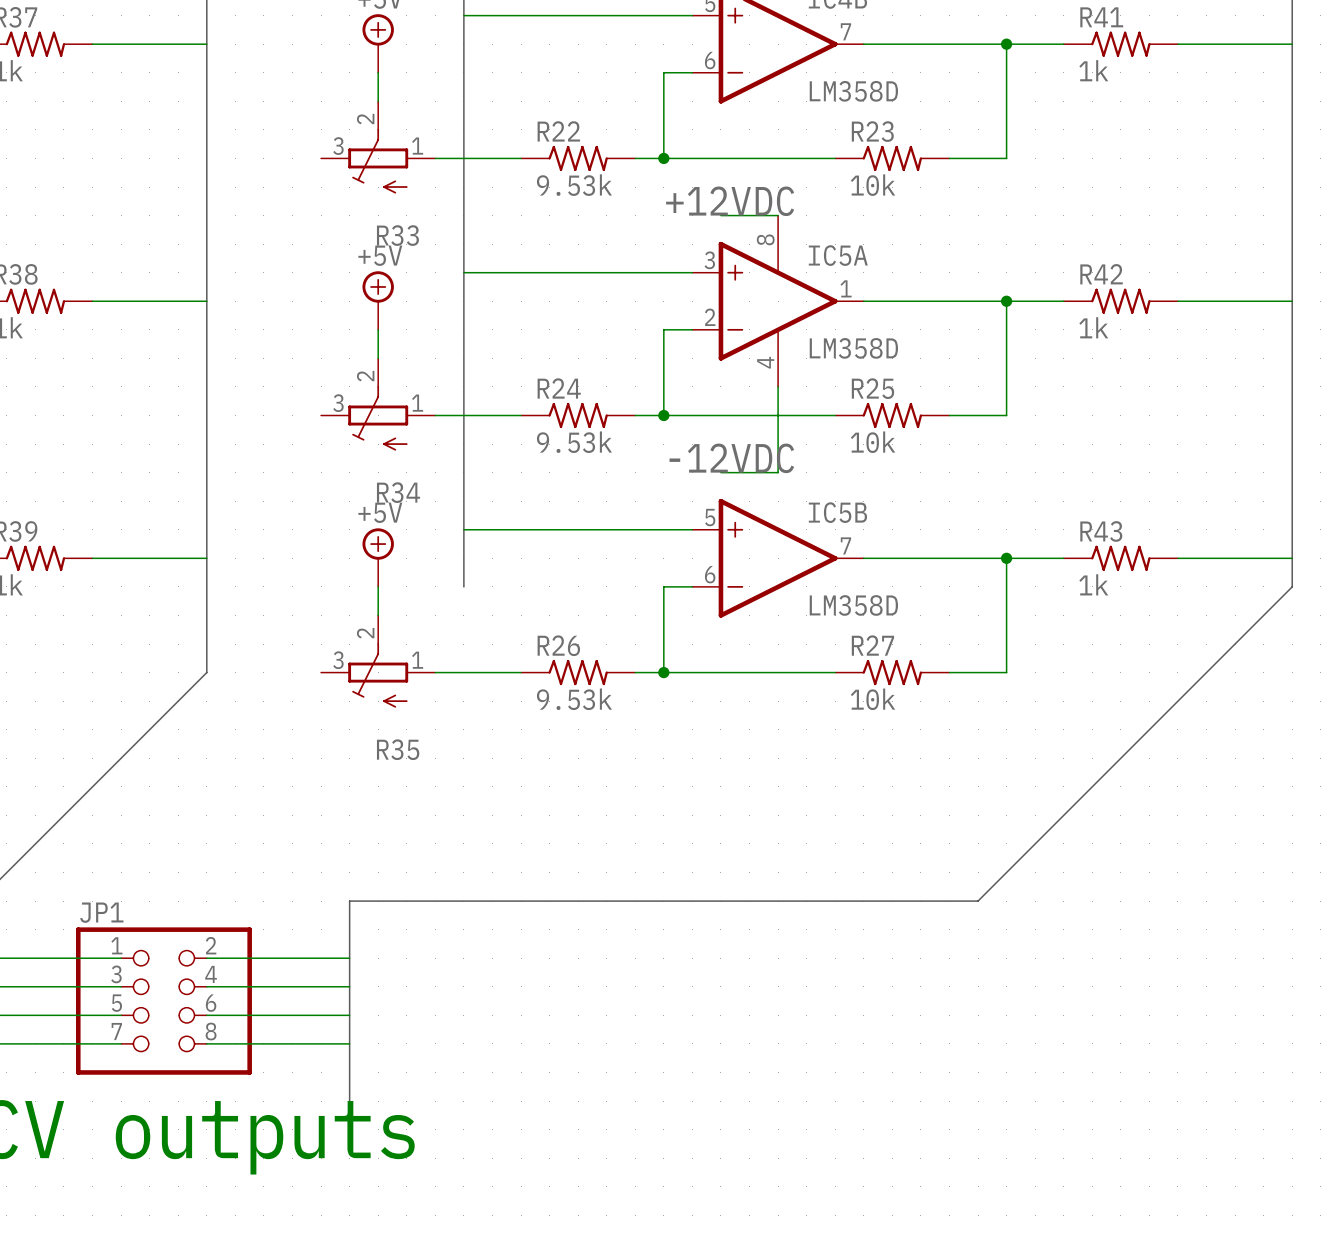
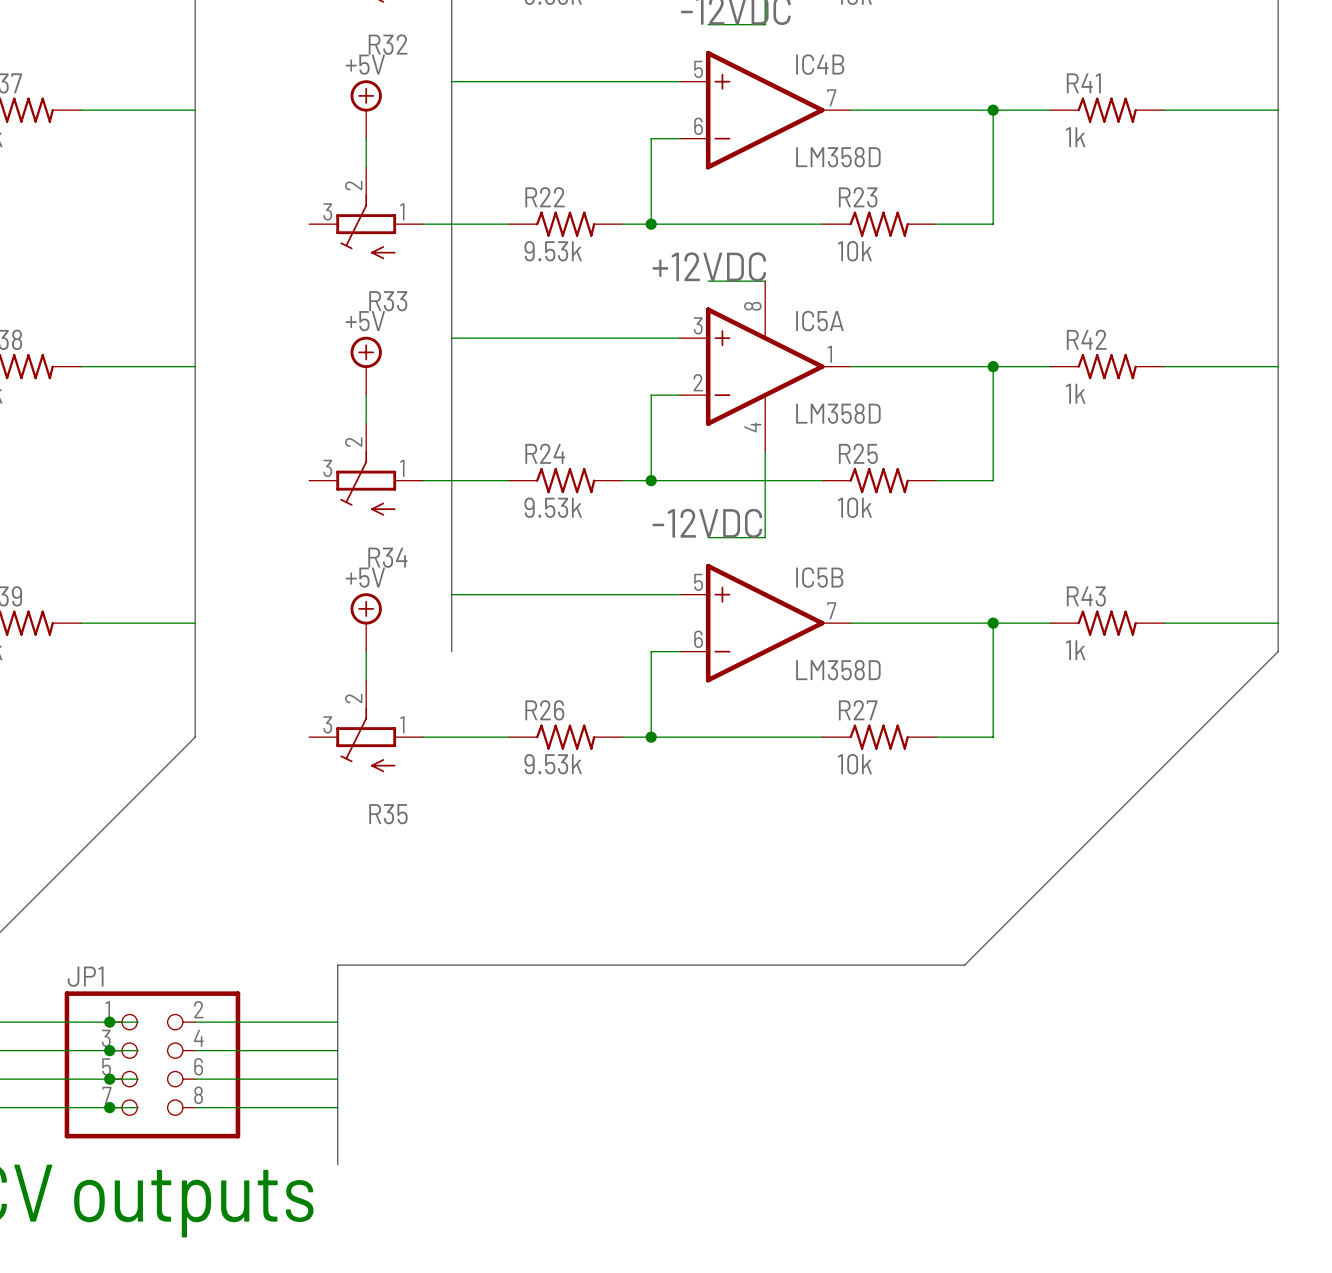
wire: none -> (109, 1022) (138, 1022)
junction: none -> (109, 1022)
wire: none -> (109, 1050) (138, 1050)
junction: none -> (109, 1050)
wire: none -> (109, 1079) (138, 1079)
junction: none -> (109, 1079)
wire: none -> (109, 1107) (138, 1107)
junction: none -> (109, 1107)

